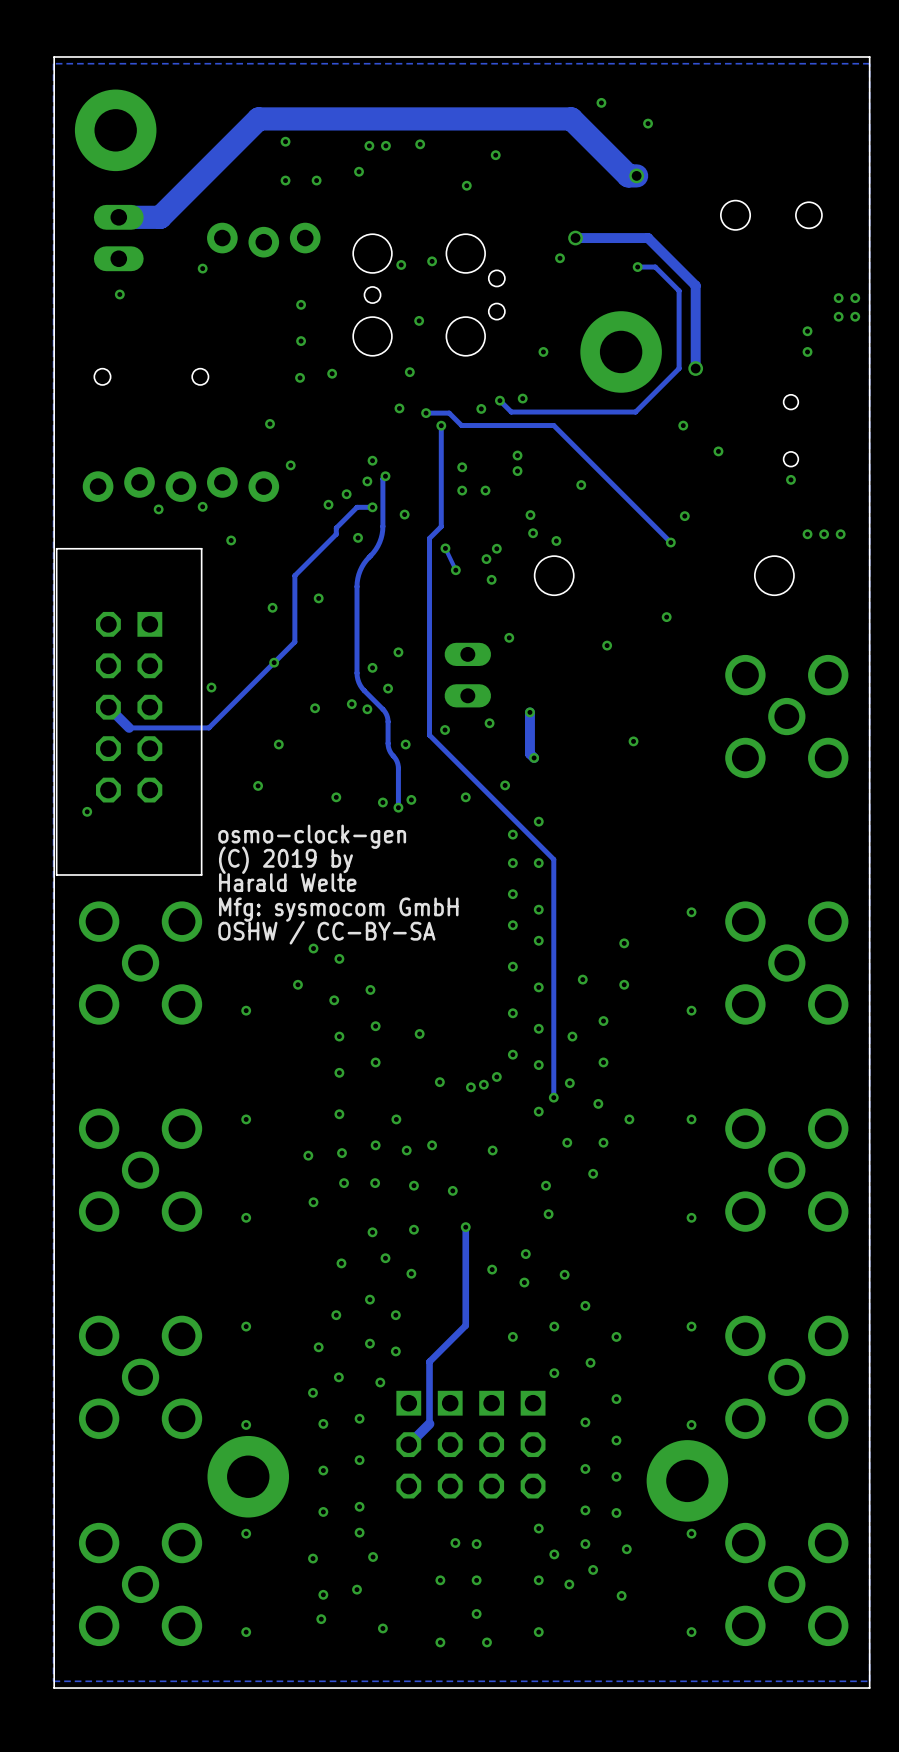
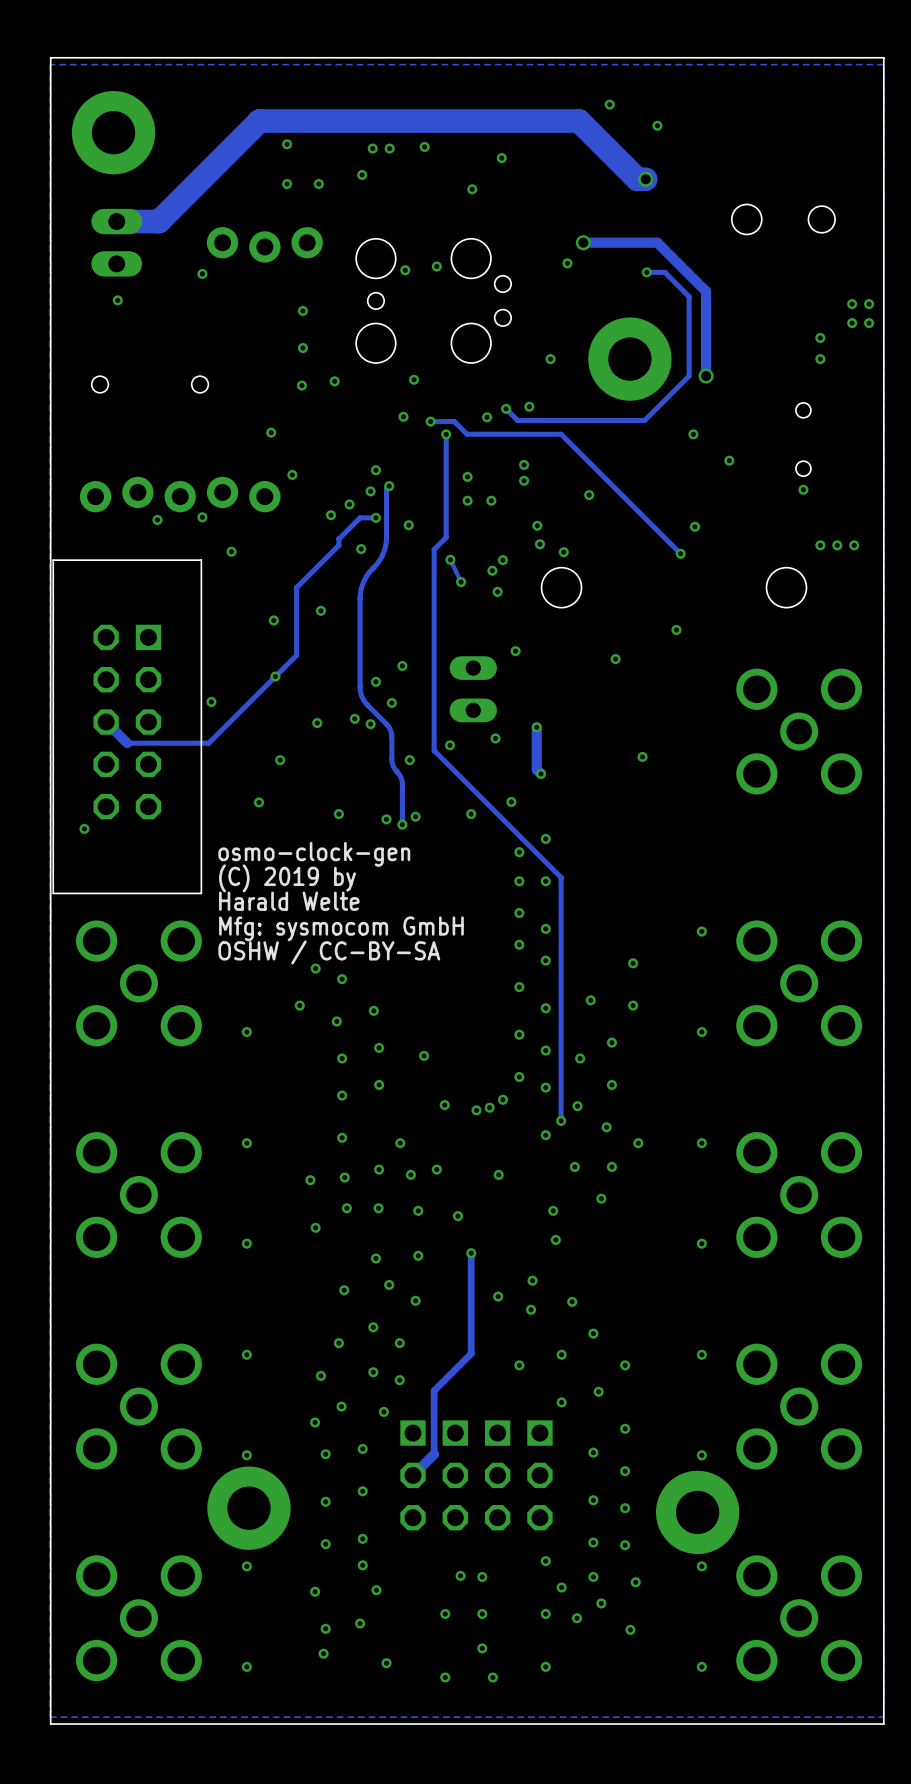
via: (419, 320) -> none

